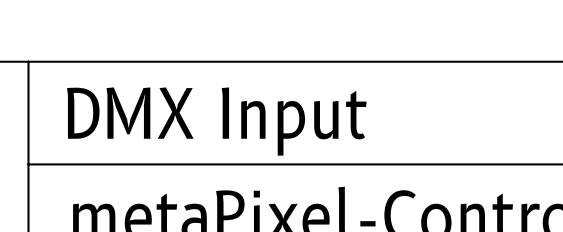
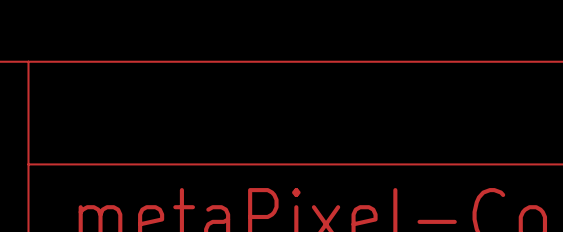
text: DMX Input (216, 121) -> none

